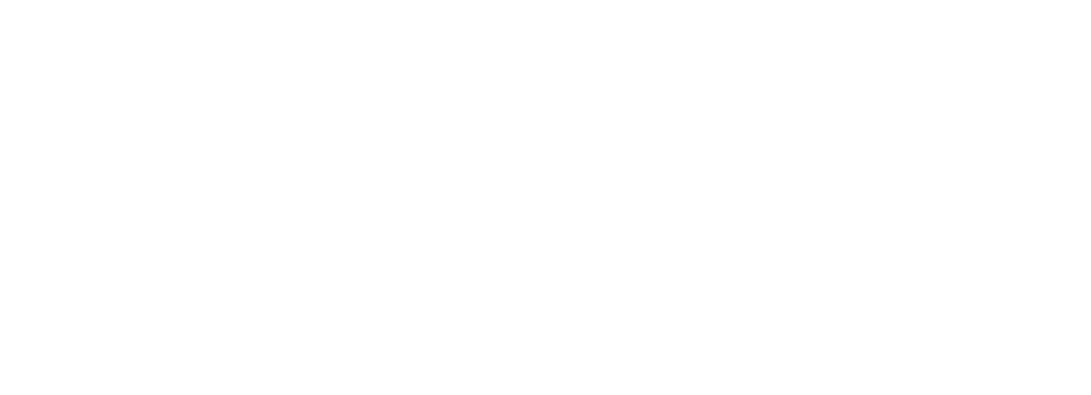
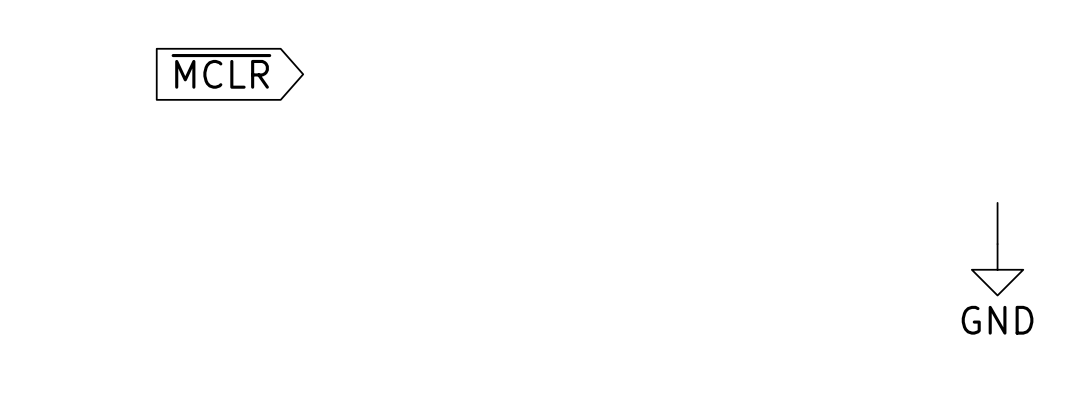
global label: none -> ~{MCLR} (221, 71)
wire: none -> (997, 202) (997, 244)
power symbol: none -> GND (997, 269)

